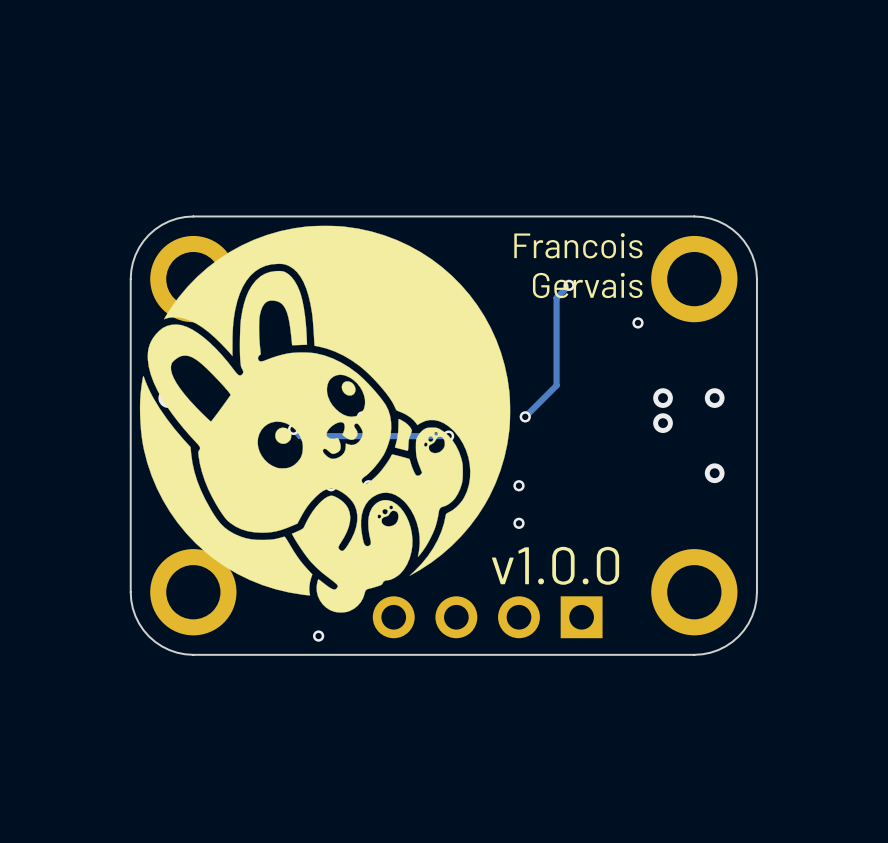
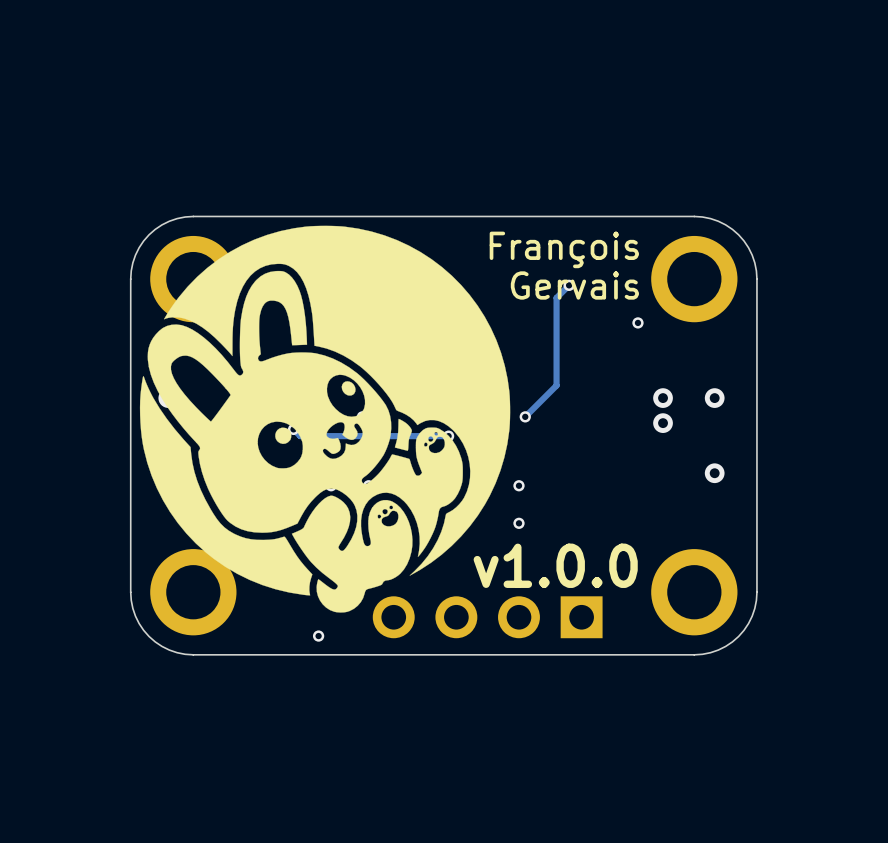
text: Francois (578, 245) -> François (564, 249)

